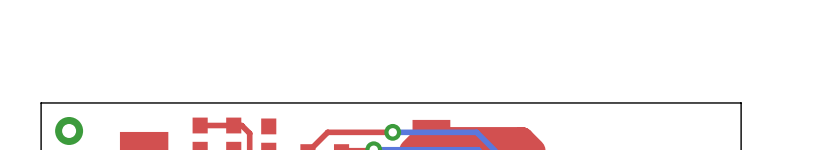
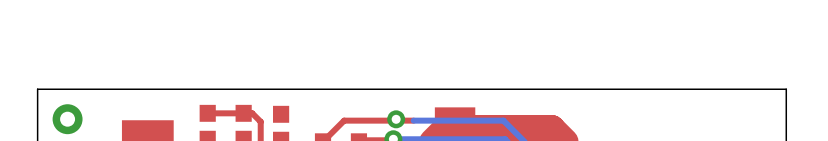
via position: (392, 132) -> (396, 119)

